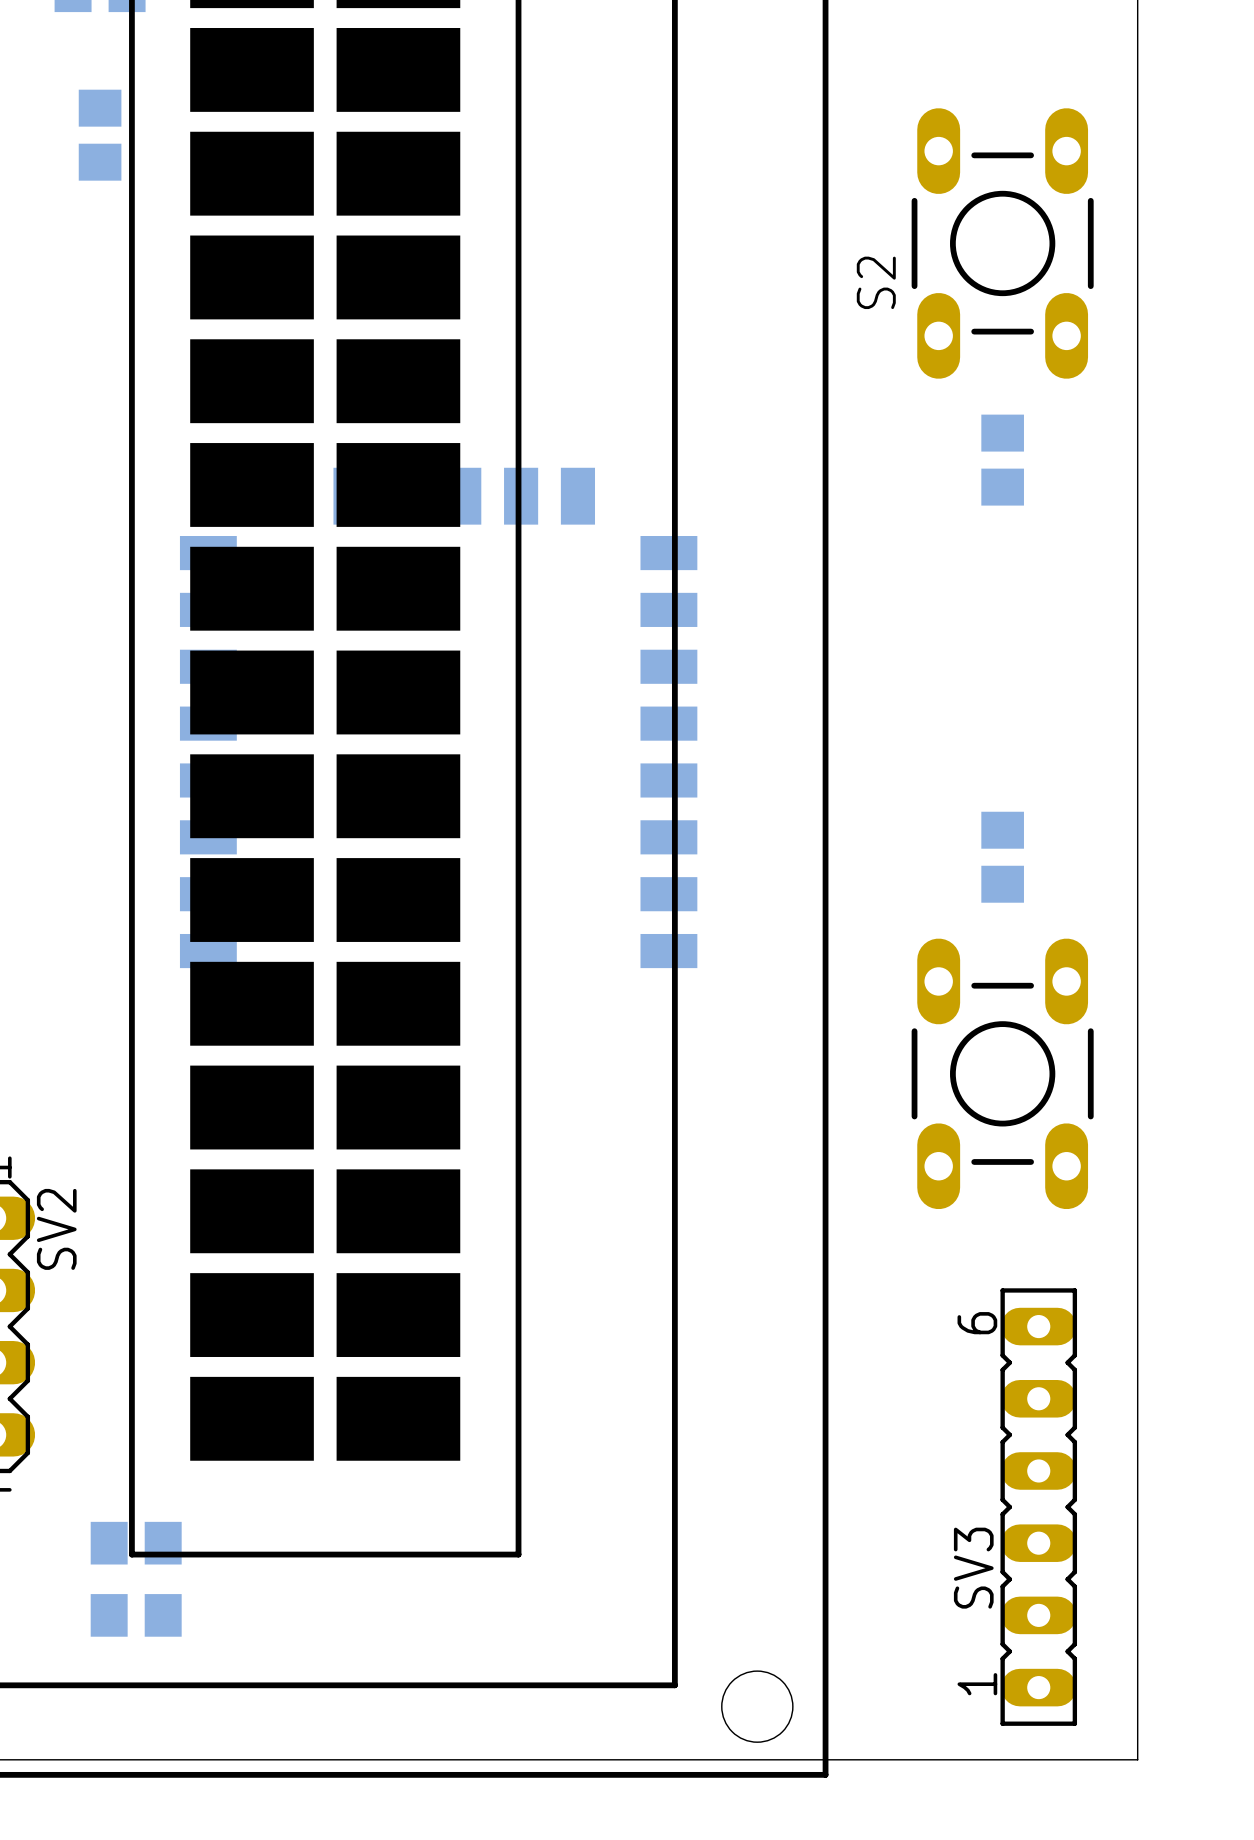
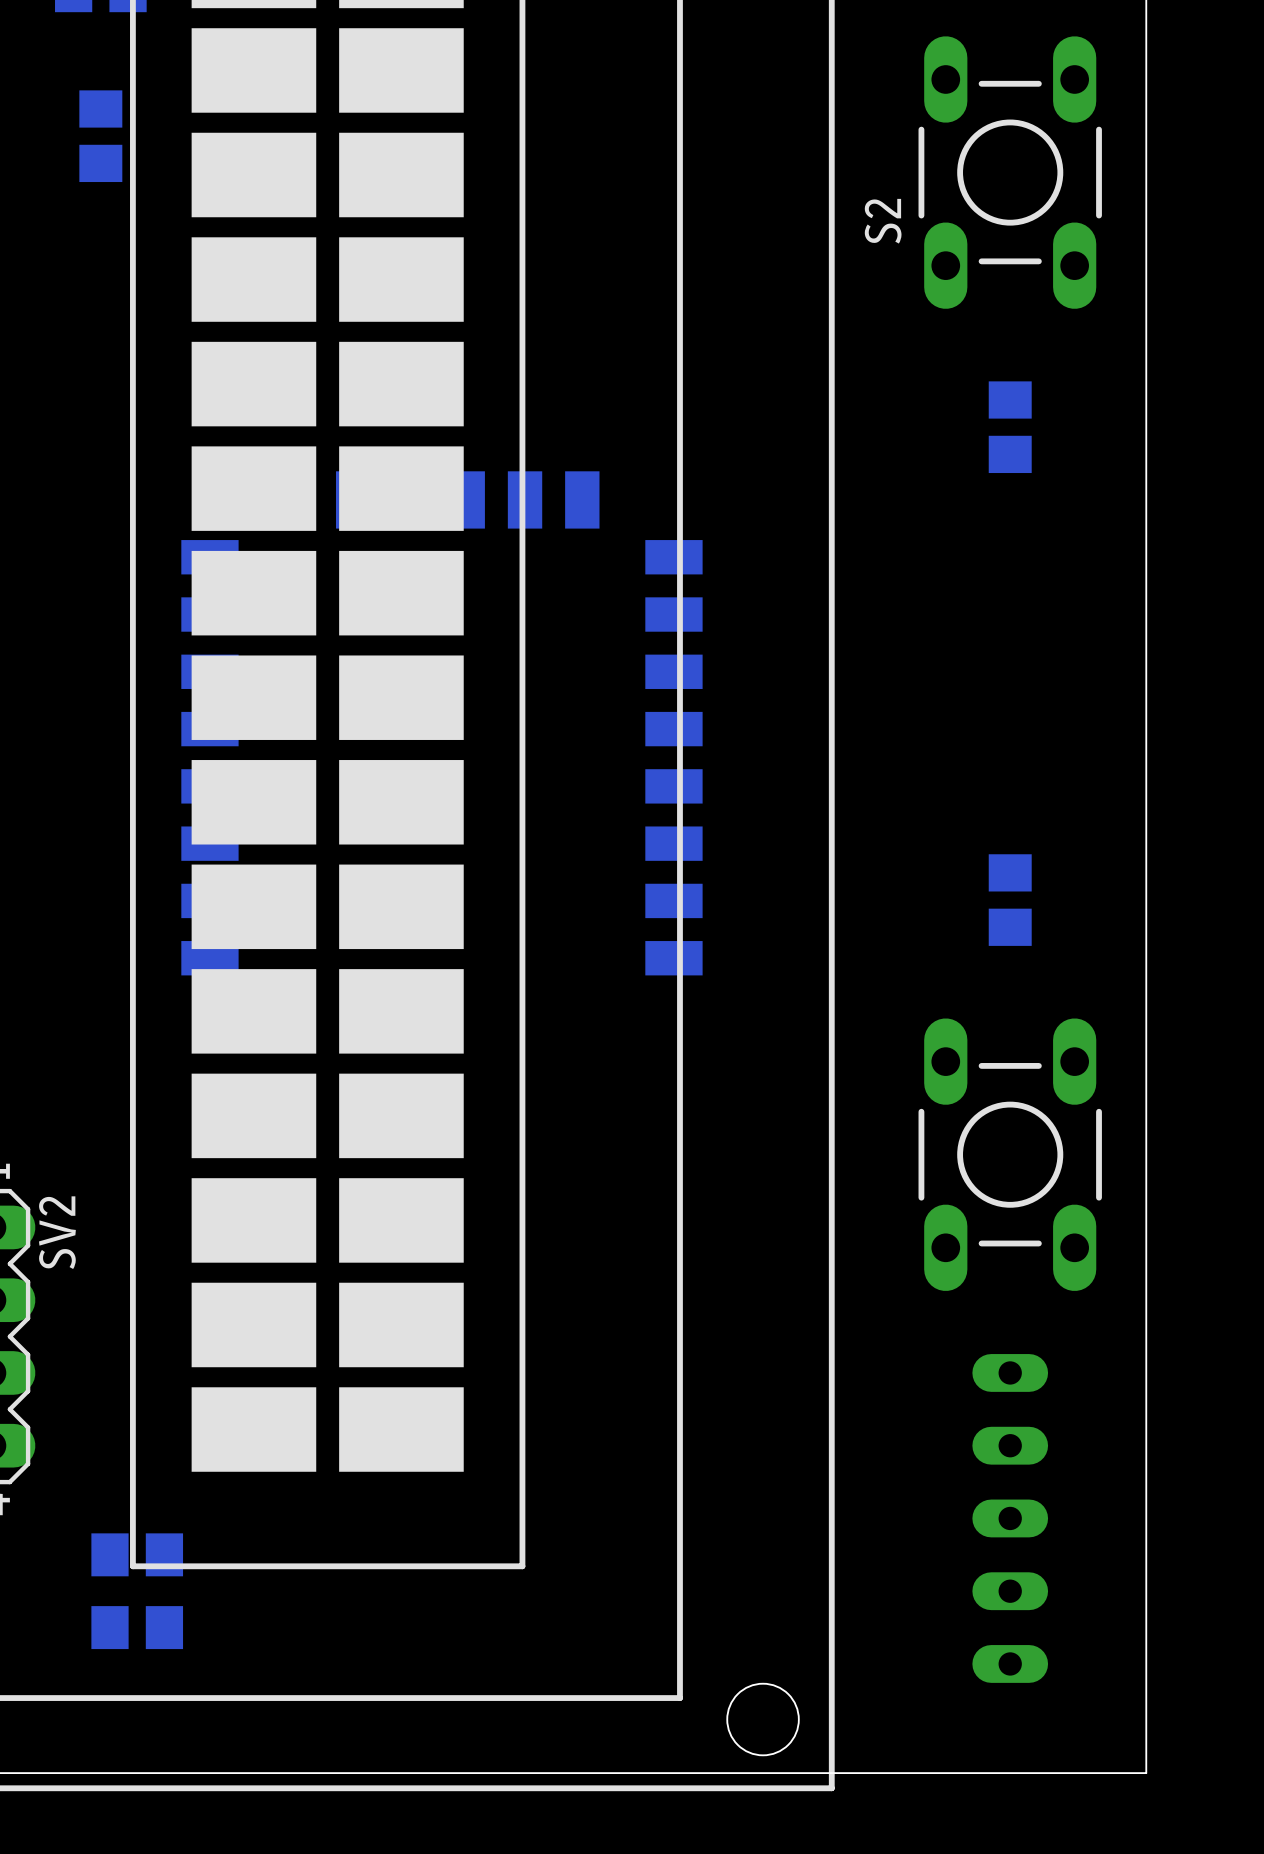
S2 position: (1002, 243) -> (1010, 172)
part position: (1002, 460) -> (1010, 427)
part position: (1002, 857) -> (1010, 900)
part position: (1002, 1073) -> (1010, 1154)
part: none -> (1010, 1518)
SV3: (1038, 1507) -> none

